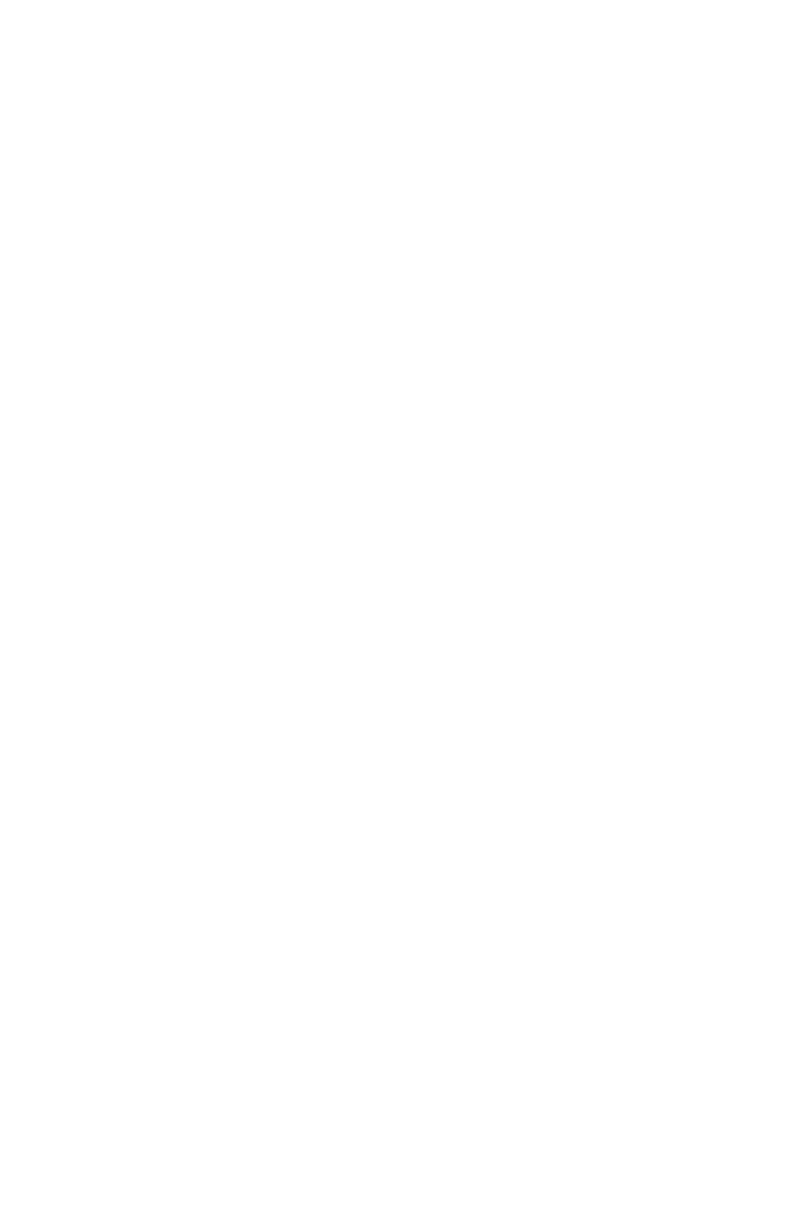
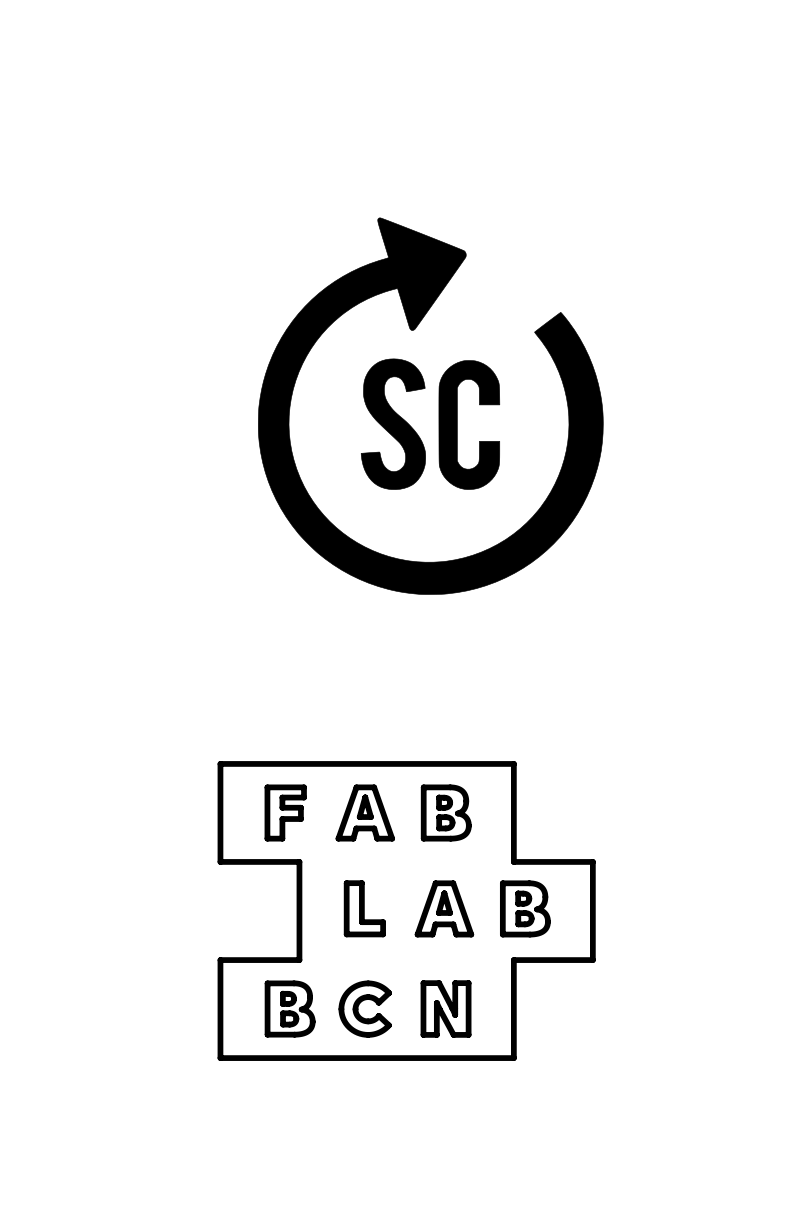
drawing: none -> [258, 217, 604, 595]
drawing: none -> [217, 761, 596, 1061]

